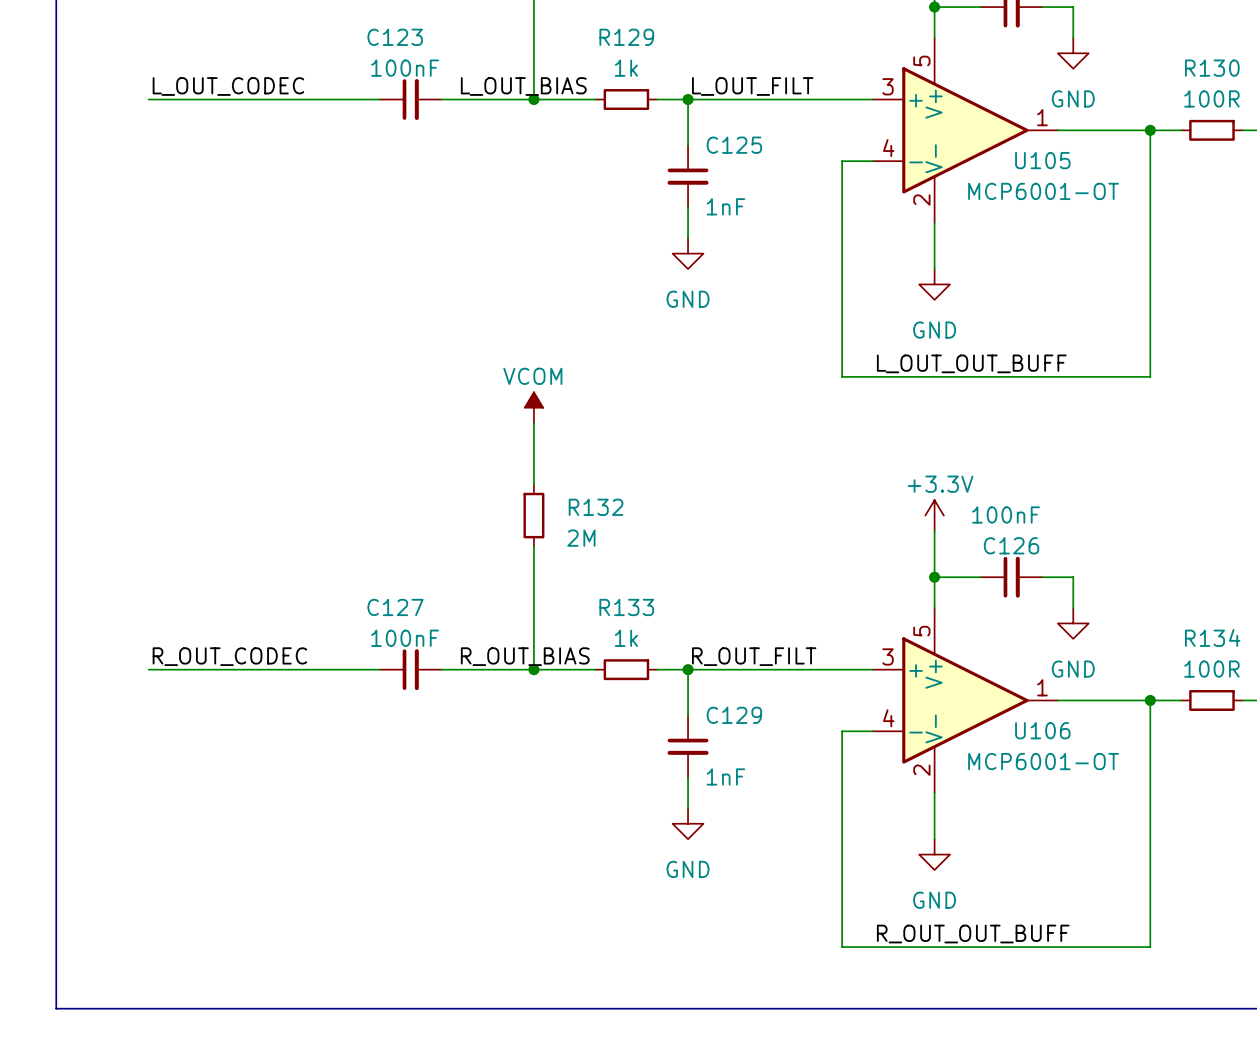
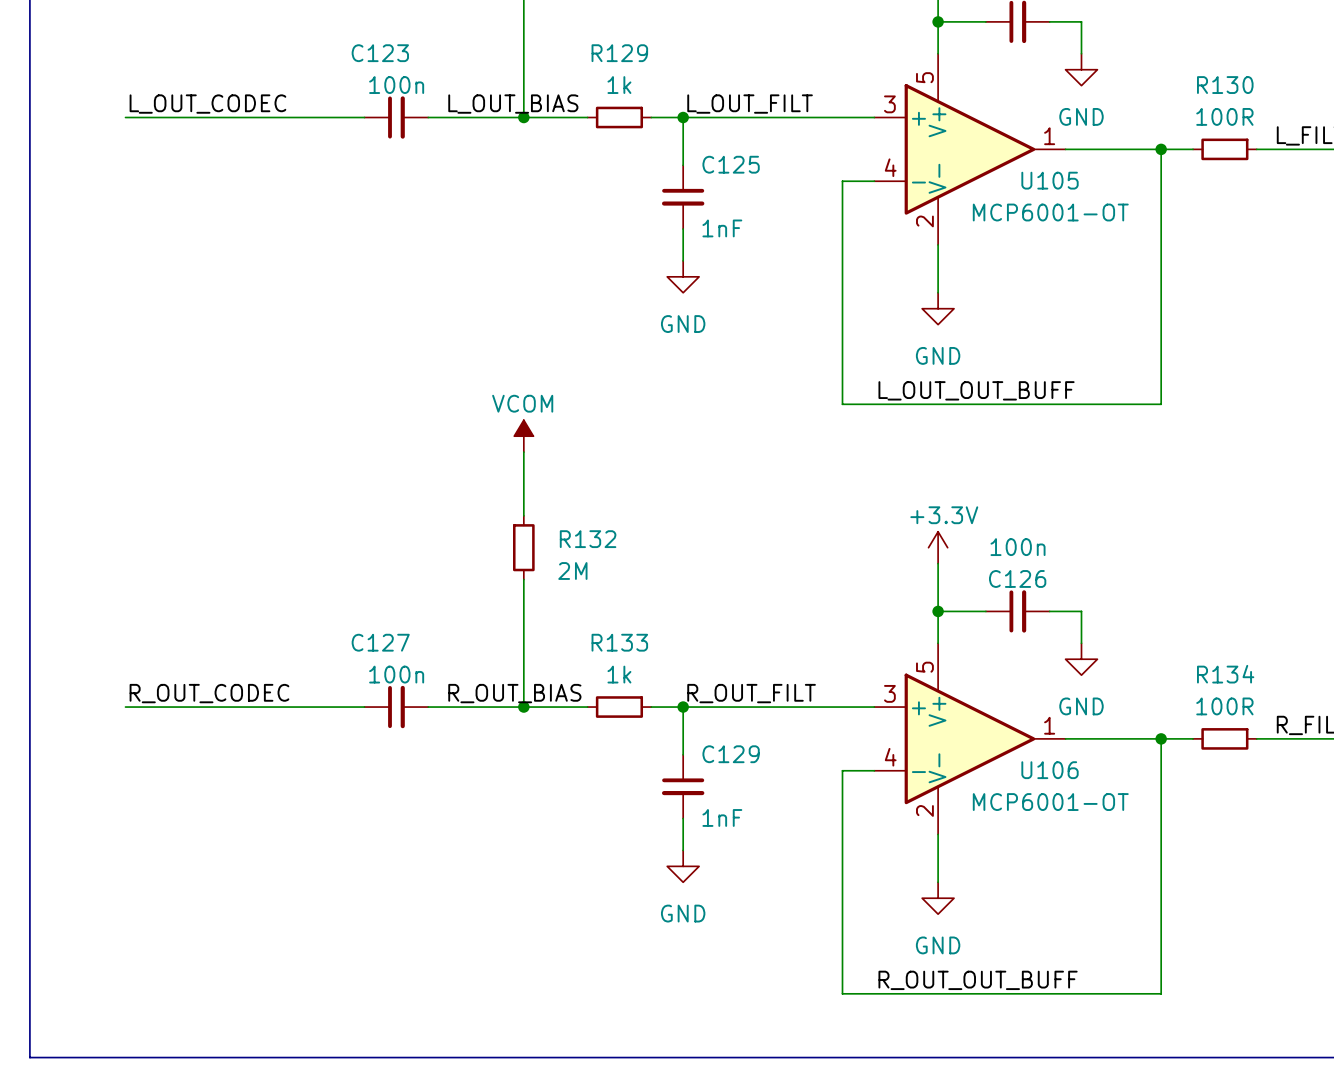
C123 value: 100nF (405, 68) -> 100n (396, 85)
C126 value: 100nF (1006, 515) -> 100n (1018, 547)
C127 value: 100nF (405, 638) -> 100n (396, 674)

